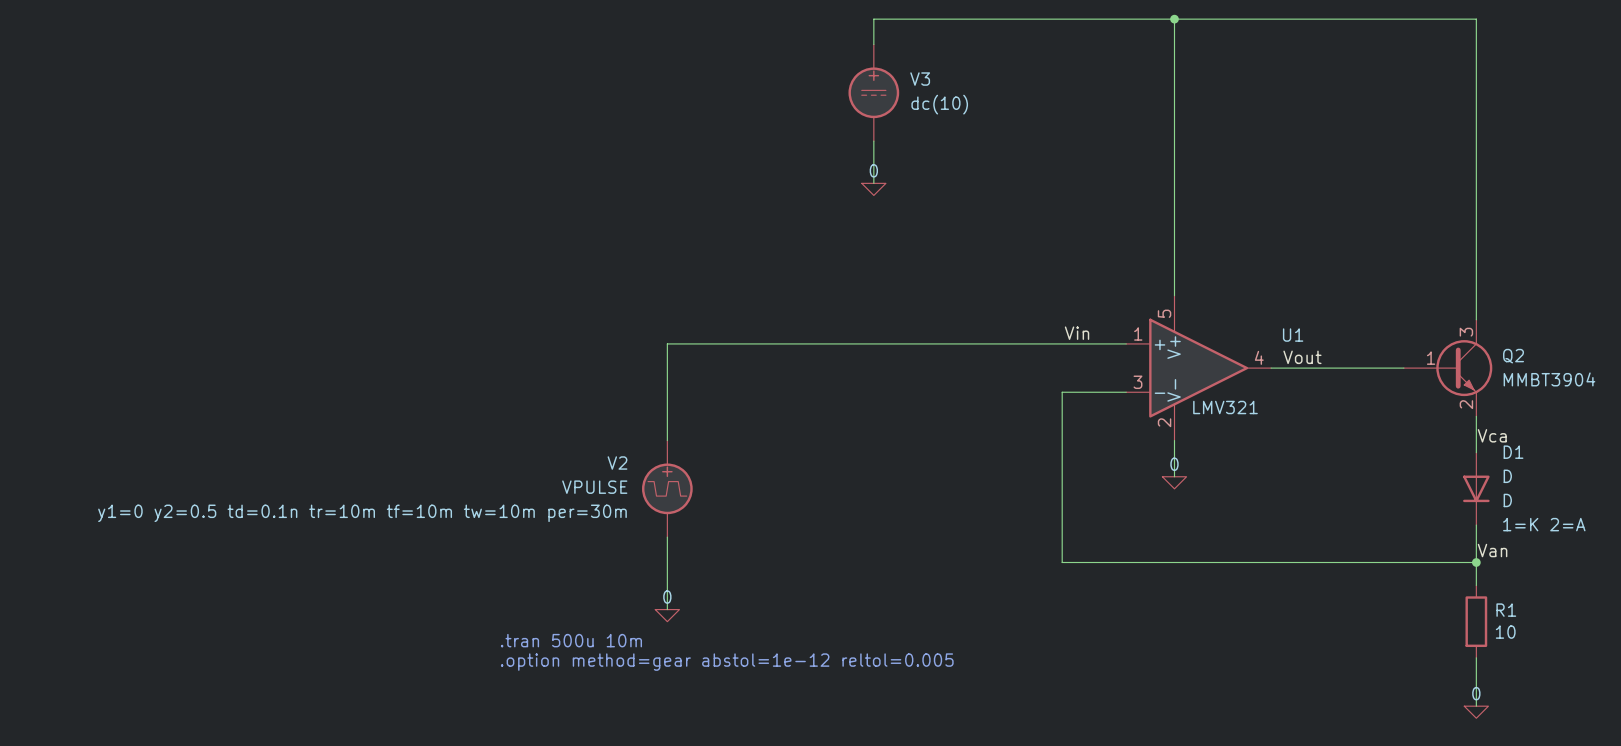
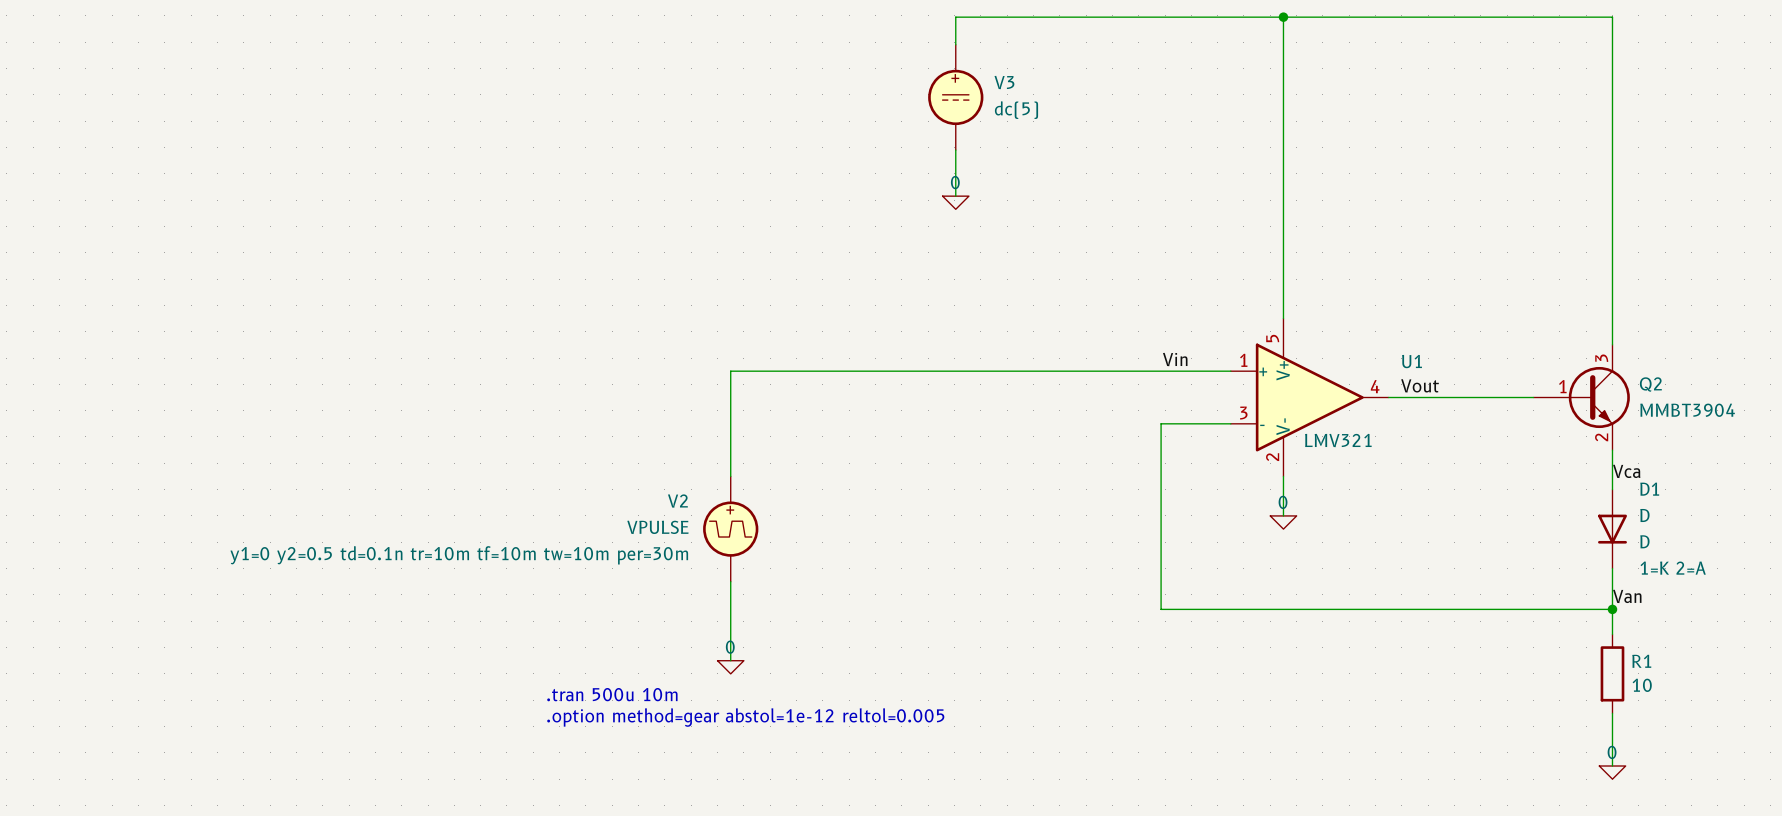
V3 value: dc(10) (939, 104) -> dc(5) (1016, 110)

